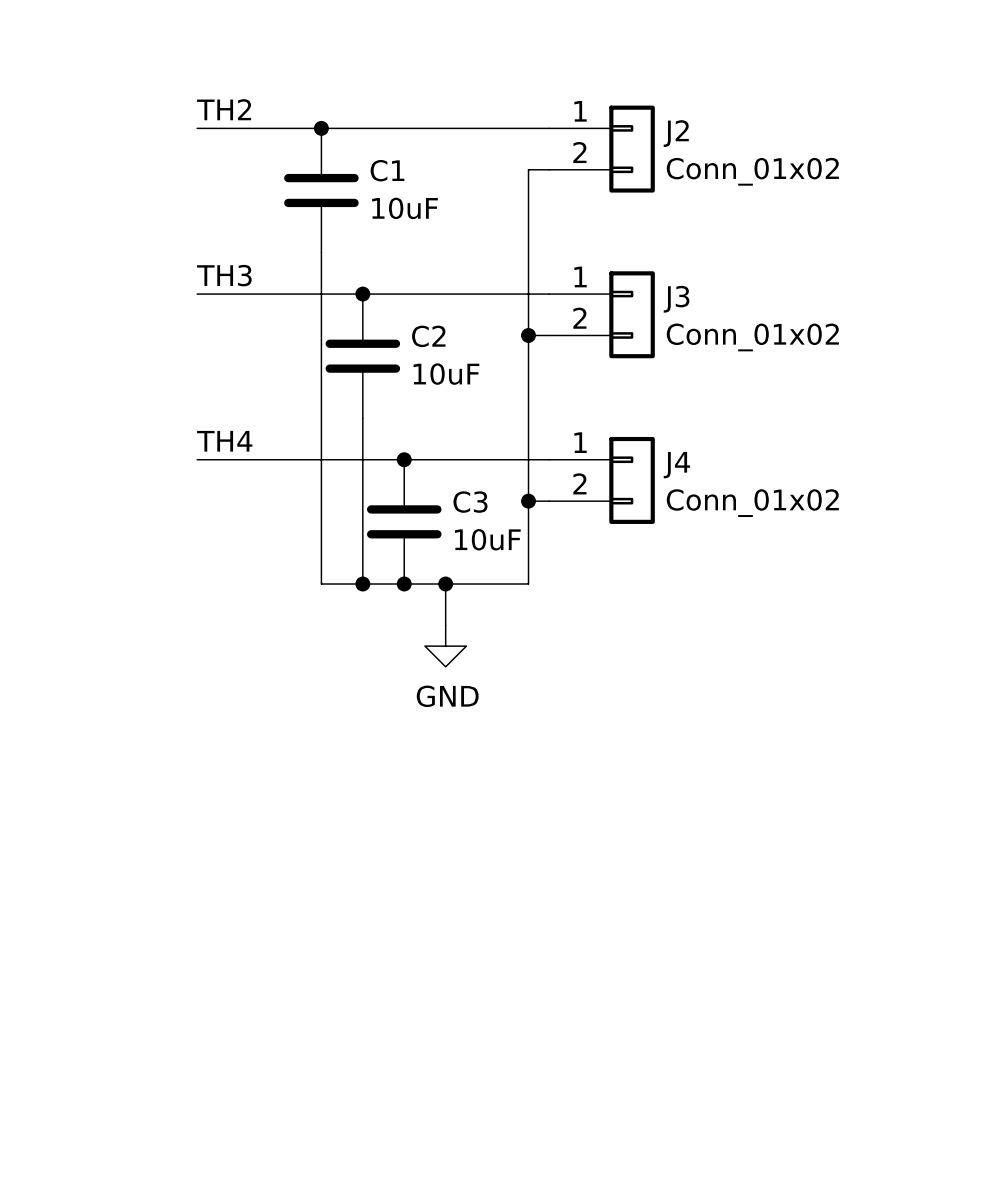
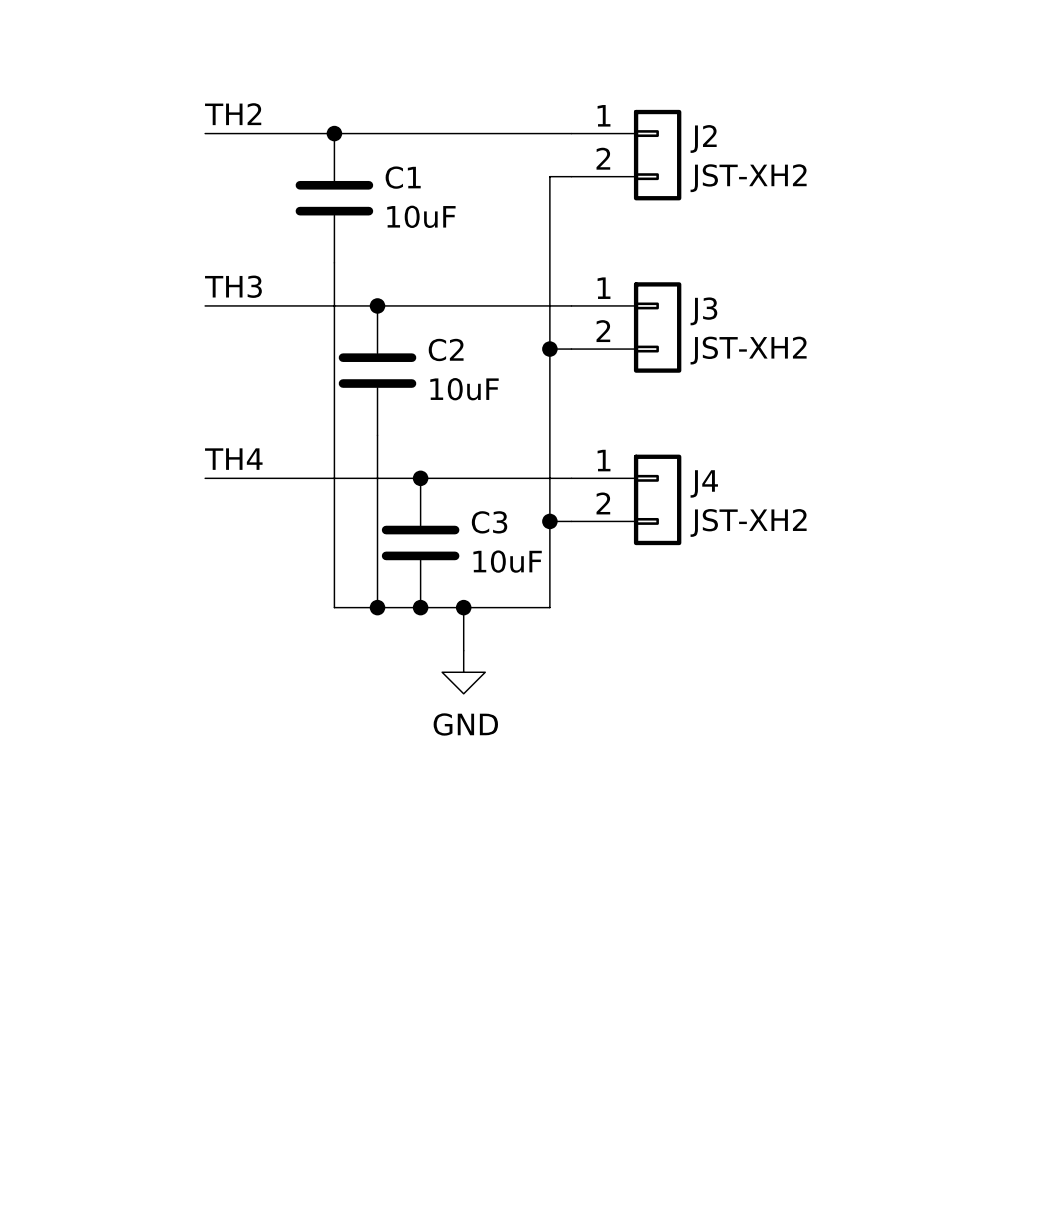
J2 value: Conn_01x02 (752, 171) -> JST-XH2 (748, 178)
J3 value: Conn_01x02 (752, 337) -> JST-XH2 (748, 350)
J4 value: Conn_01x02 (752, 503) -> JST-XH2 (748, 522)

